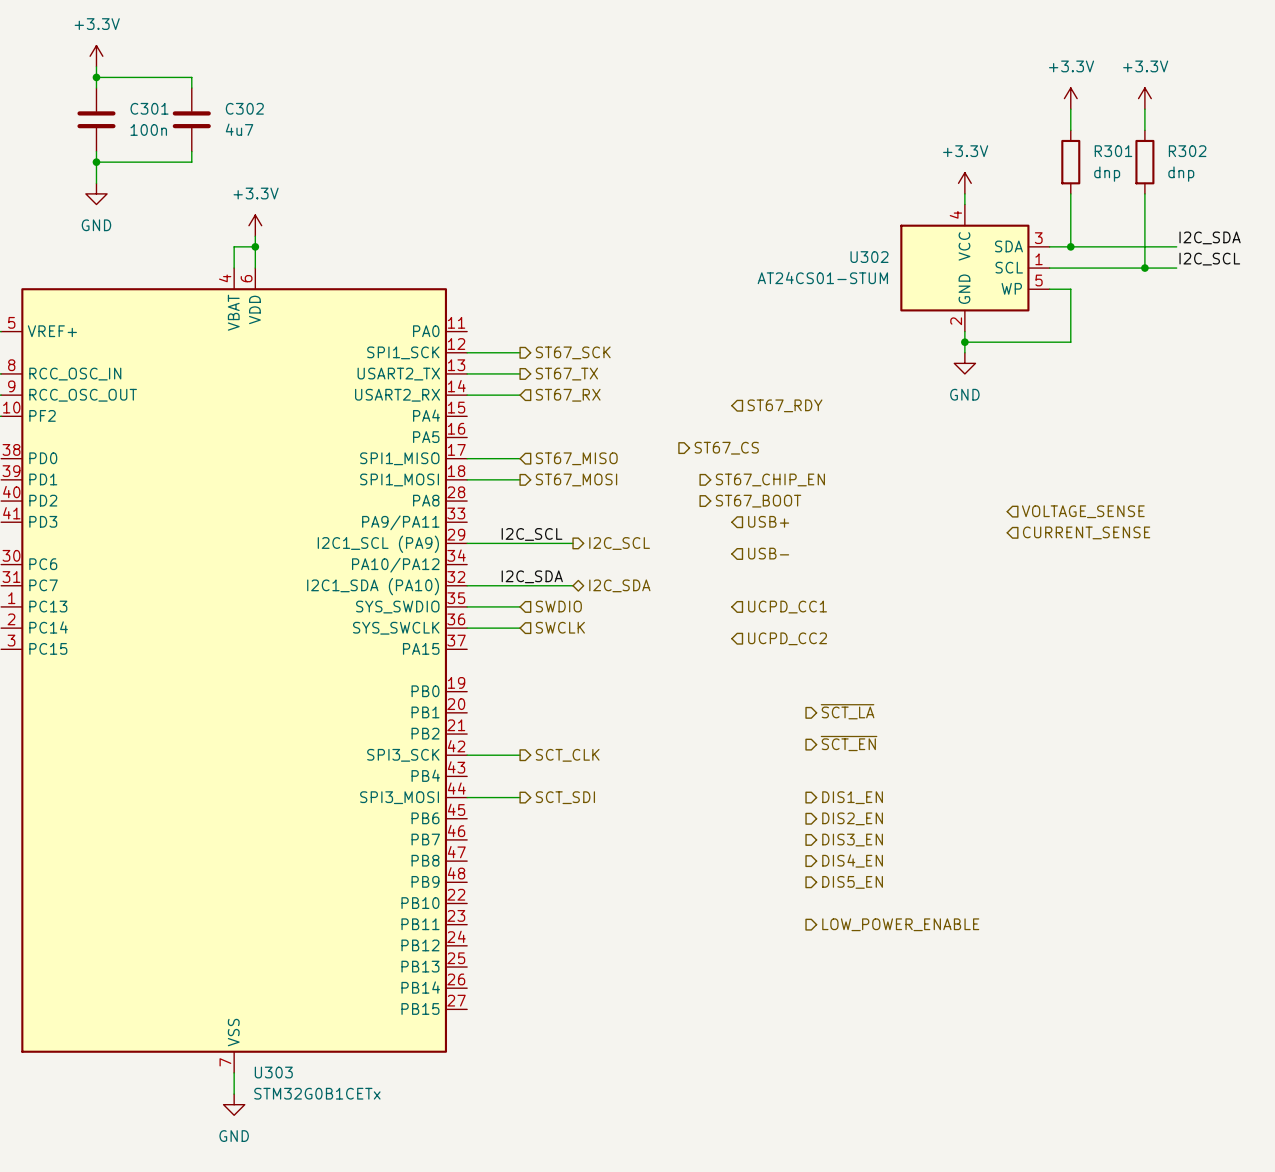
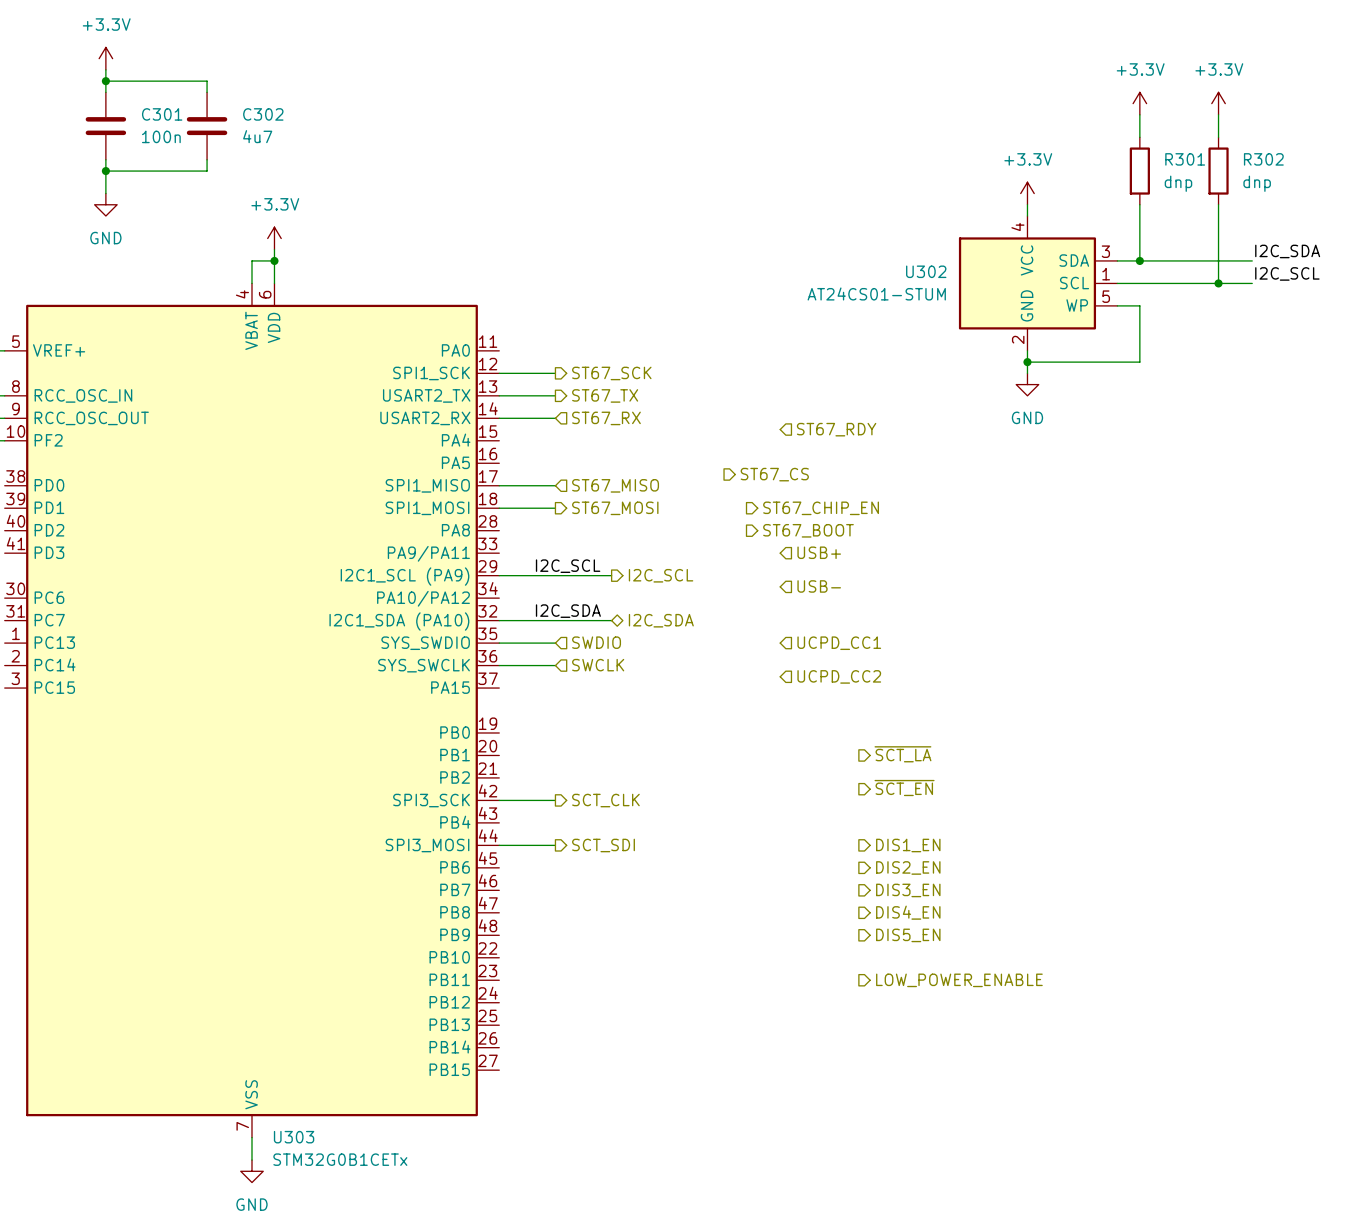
hierarchical label: VOLTAGE_SENSE (1083, 511) -> none
hierarchical label: CURRENT_SENSE (1086, 532) -> none

